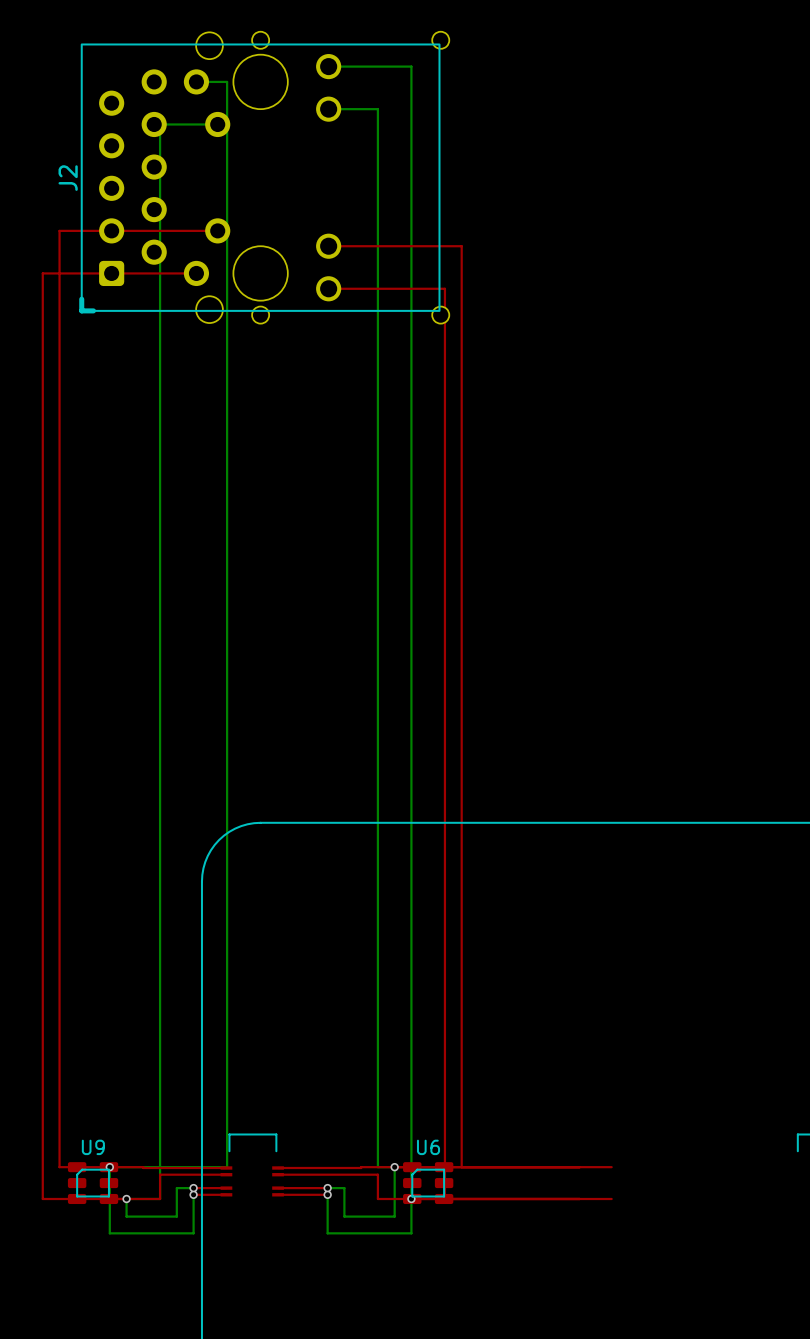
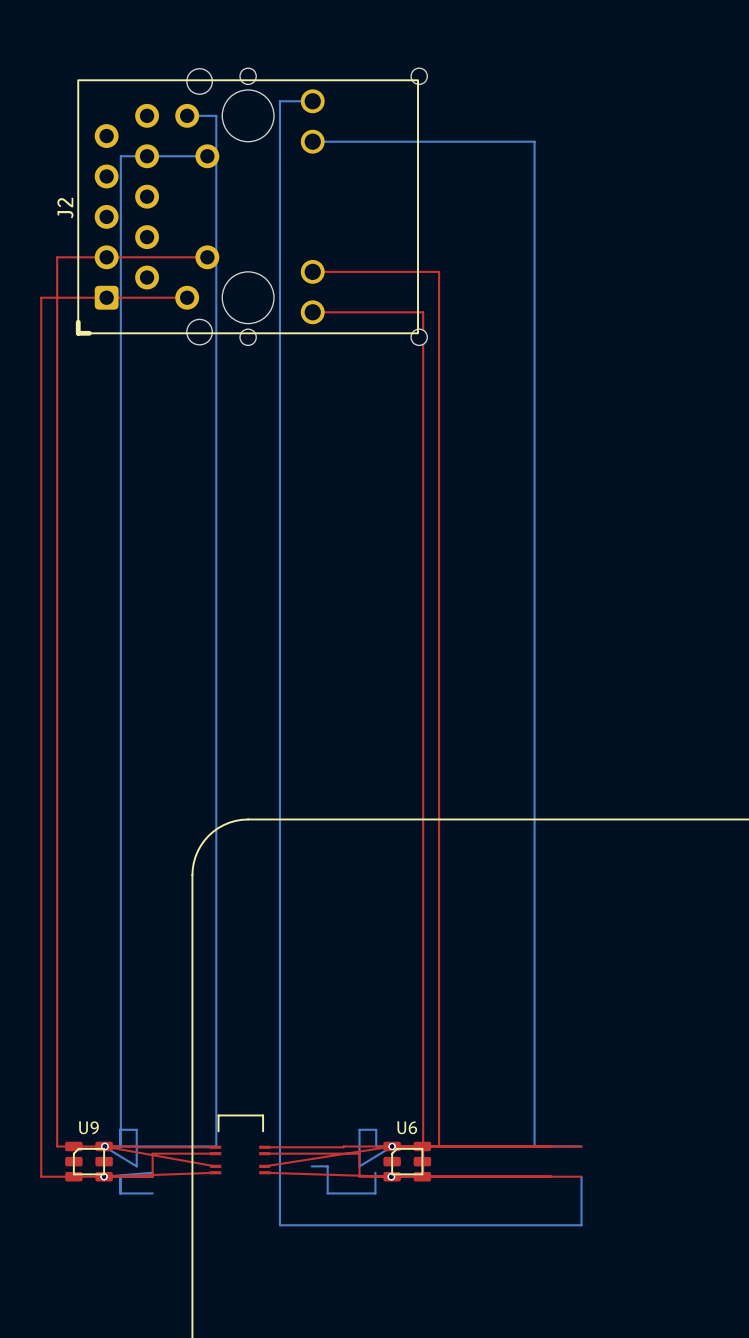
bottom track: (328, 66) (411, 66) (411, 1233) (327, 1233) (327, 1194) -> (312, 101) (279, 101) (279, 1225) (581, 1225) (581, 1176)
bottom track: (377, 109) (377, 1149) -> (359, 141) (534, 141) (534, 1146) (581, 1146)
bottom track: (160, 124) (160, 1194) -> (152, 156) (120, 156) (120, 1146)
bottom track: (109, 1167) (109, 1233) (193, 1233) (193, 1194) -> (104, 1146) (136, 1166) (136, 1129) (120, 1129) (120, 1146)
bottom track: (377, 1167) (394, 1167) (394, 1194) -> (359, 1146) (359, 1166) (392, 1146) (376, 1146) (376, 1129) (359, 1129)
via: (394, 1167) -> none
via: none -> (392, 1146)
top track: (193, 1188) (226, 1188) -> (104, 1146) (215, 1166)
bottom track: (193, 1188) (176, 1188) (176, 1216) (160, 1216) -> none
via: (193, 1188) -> none
top track: (278, 1188) (327, 1188) -> (264, 1166) (392, 1146)
via: (327, 1188) -> none
bottom track: none -> (152, 1172) (104, 1176) (120, 1176) (120, 1193)
top track: (193, 1194) (226, 1194) -> (104, 1176) (215, 1172)
via: (193, 1194) -> none
top track: (278, 1194) (327, 1194) -> (264, 1172) (392, 1176)
via: (327, 1194) -> none
via: none -> (104, 1176)
via: (126, 1198) -> none

